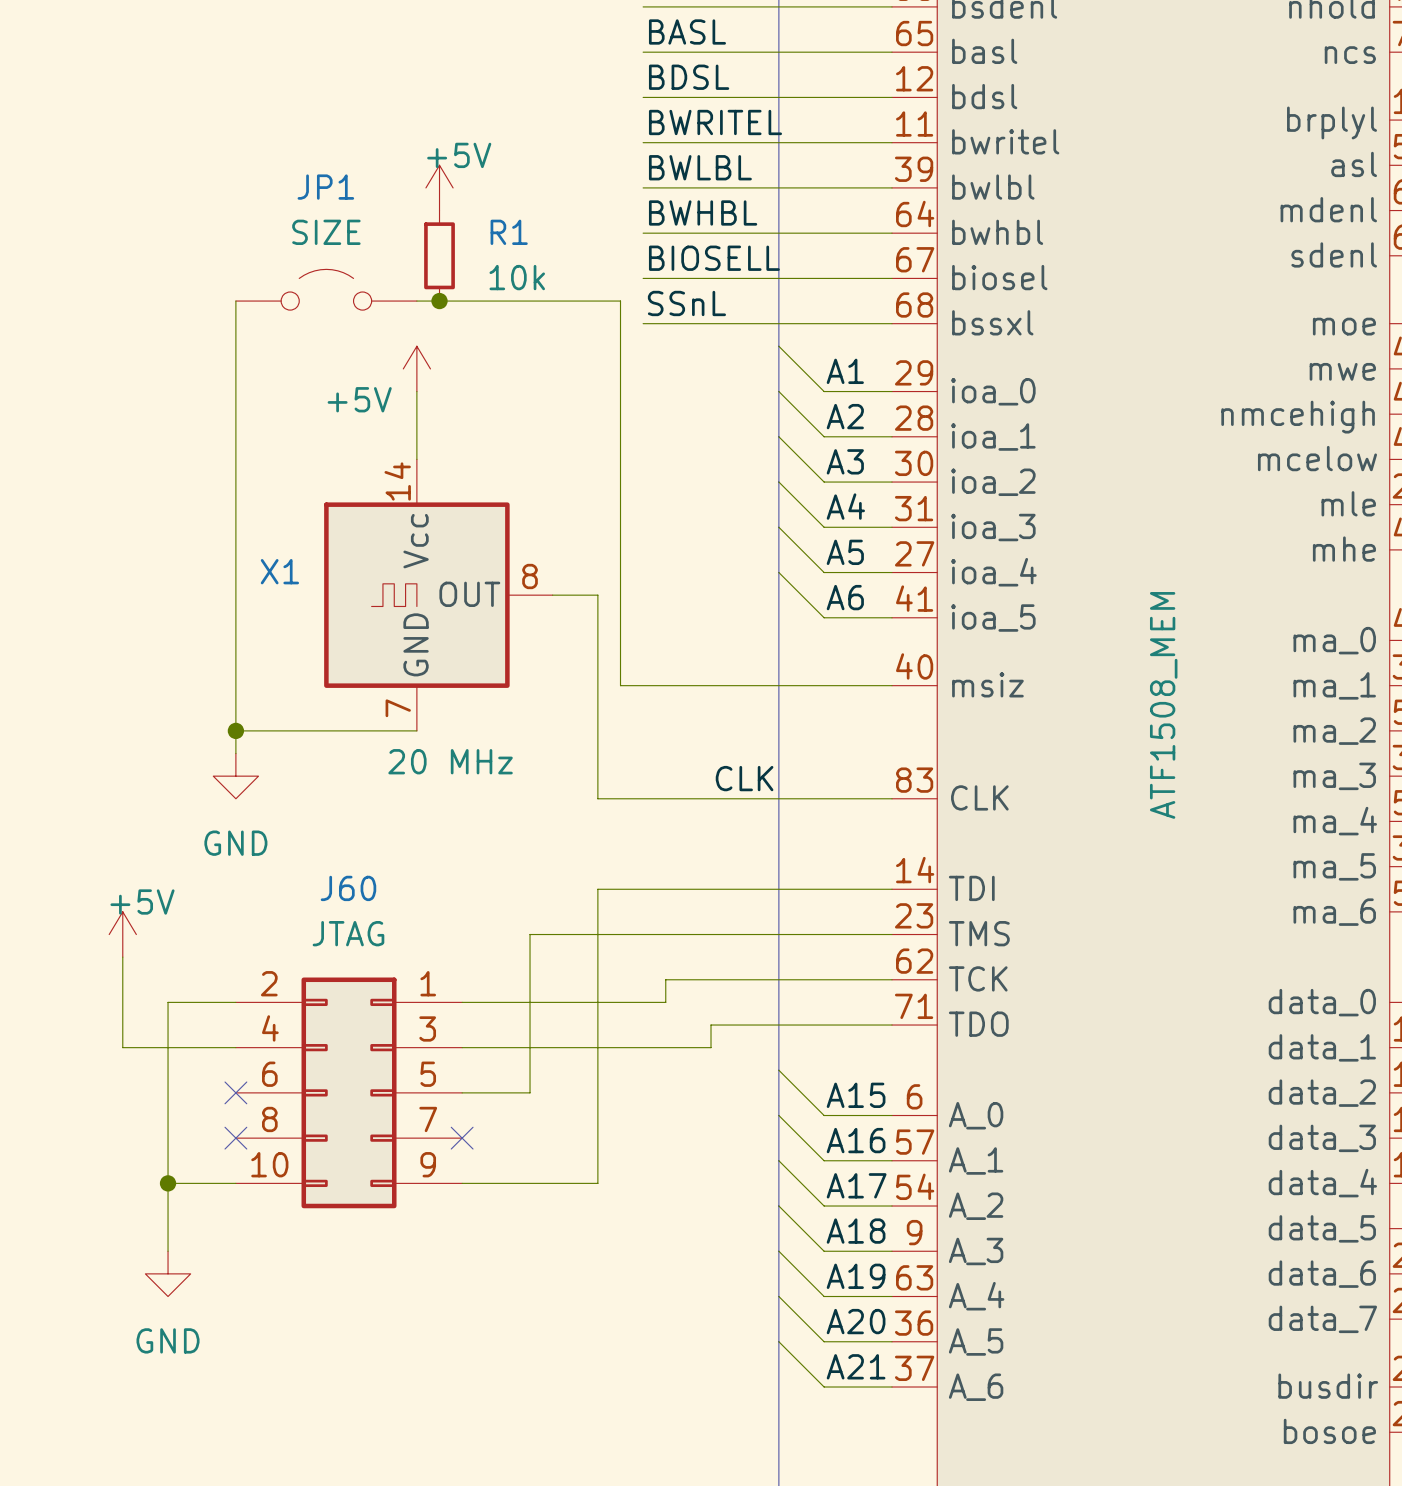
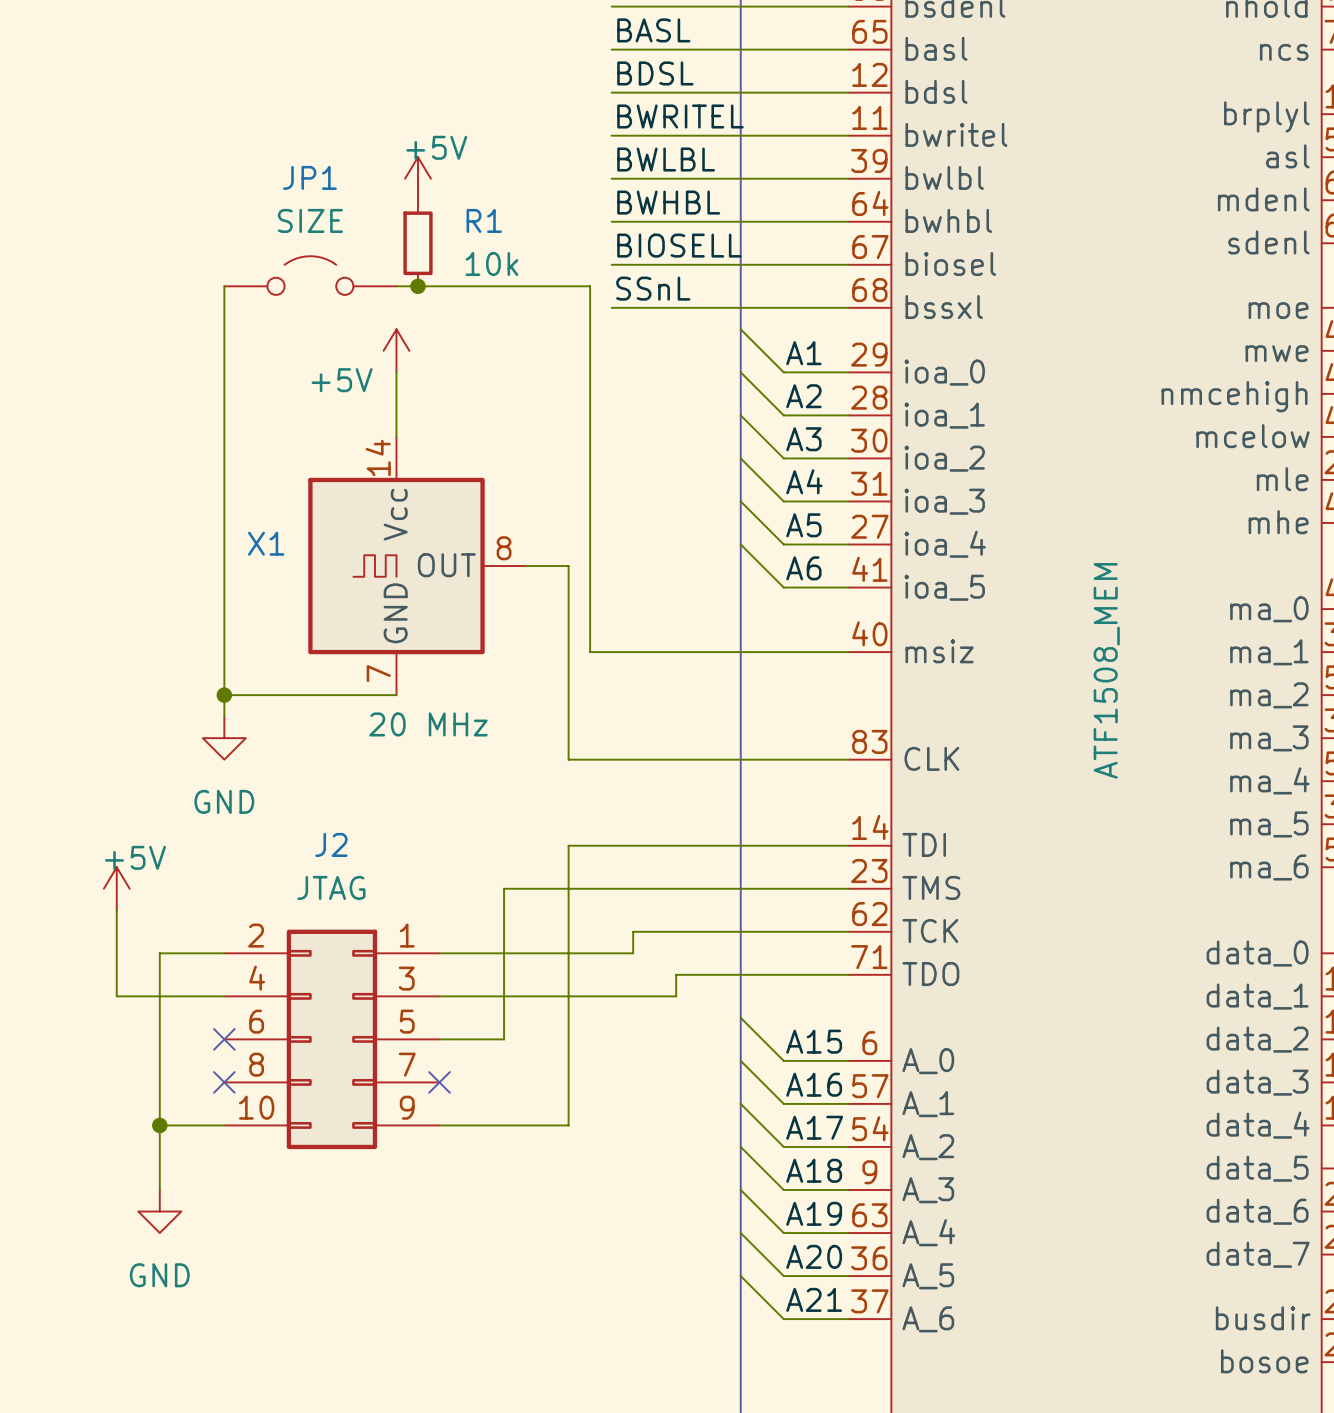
label: CLK (744, 778) -> none
J60 name: J60 (348, 888) -> J2 (331, 844)

